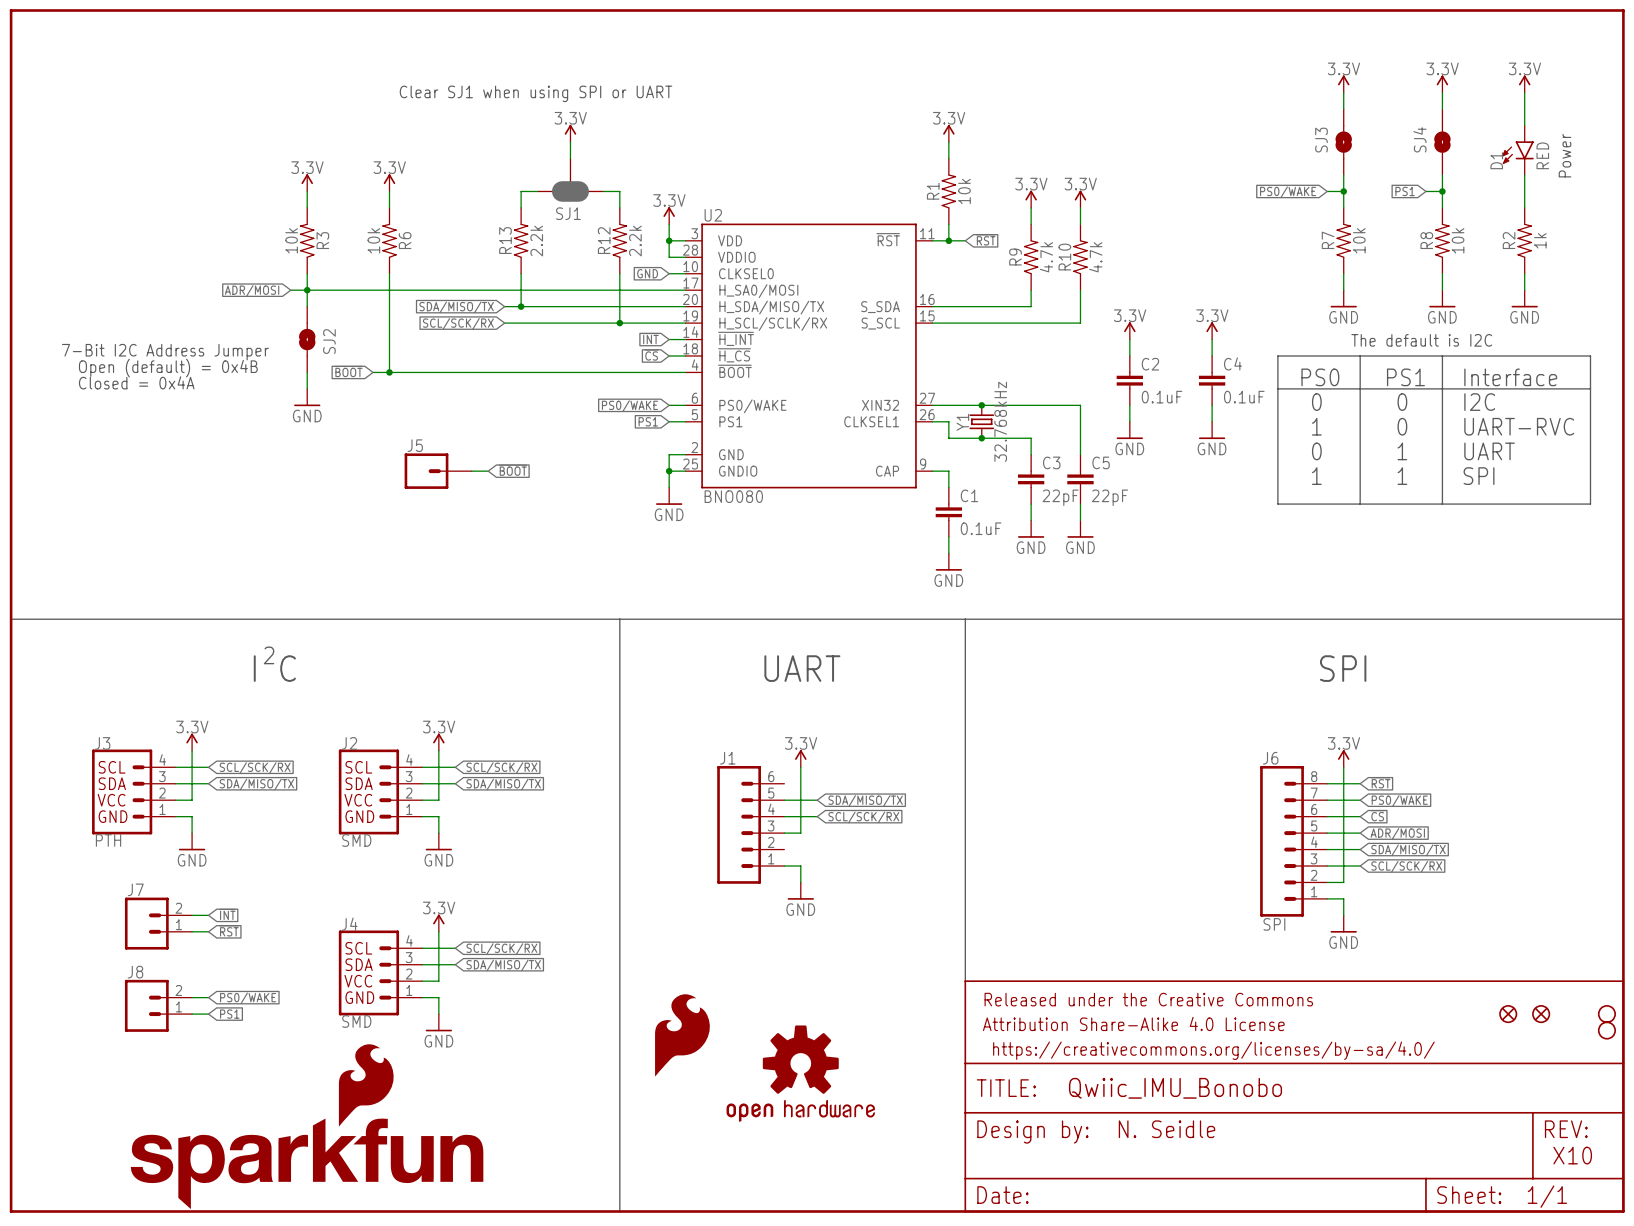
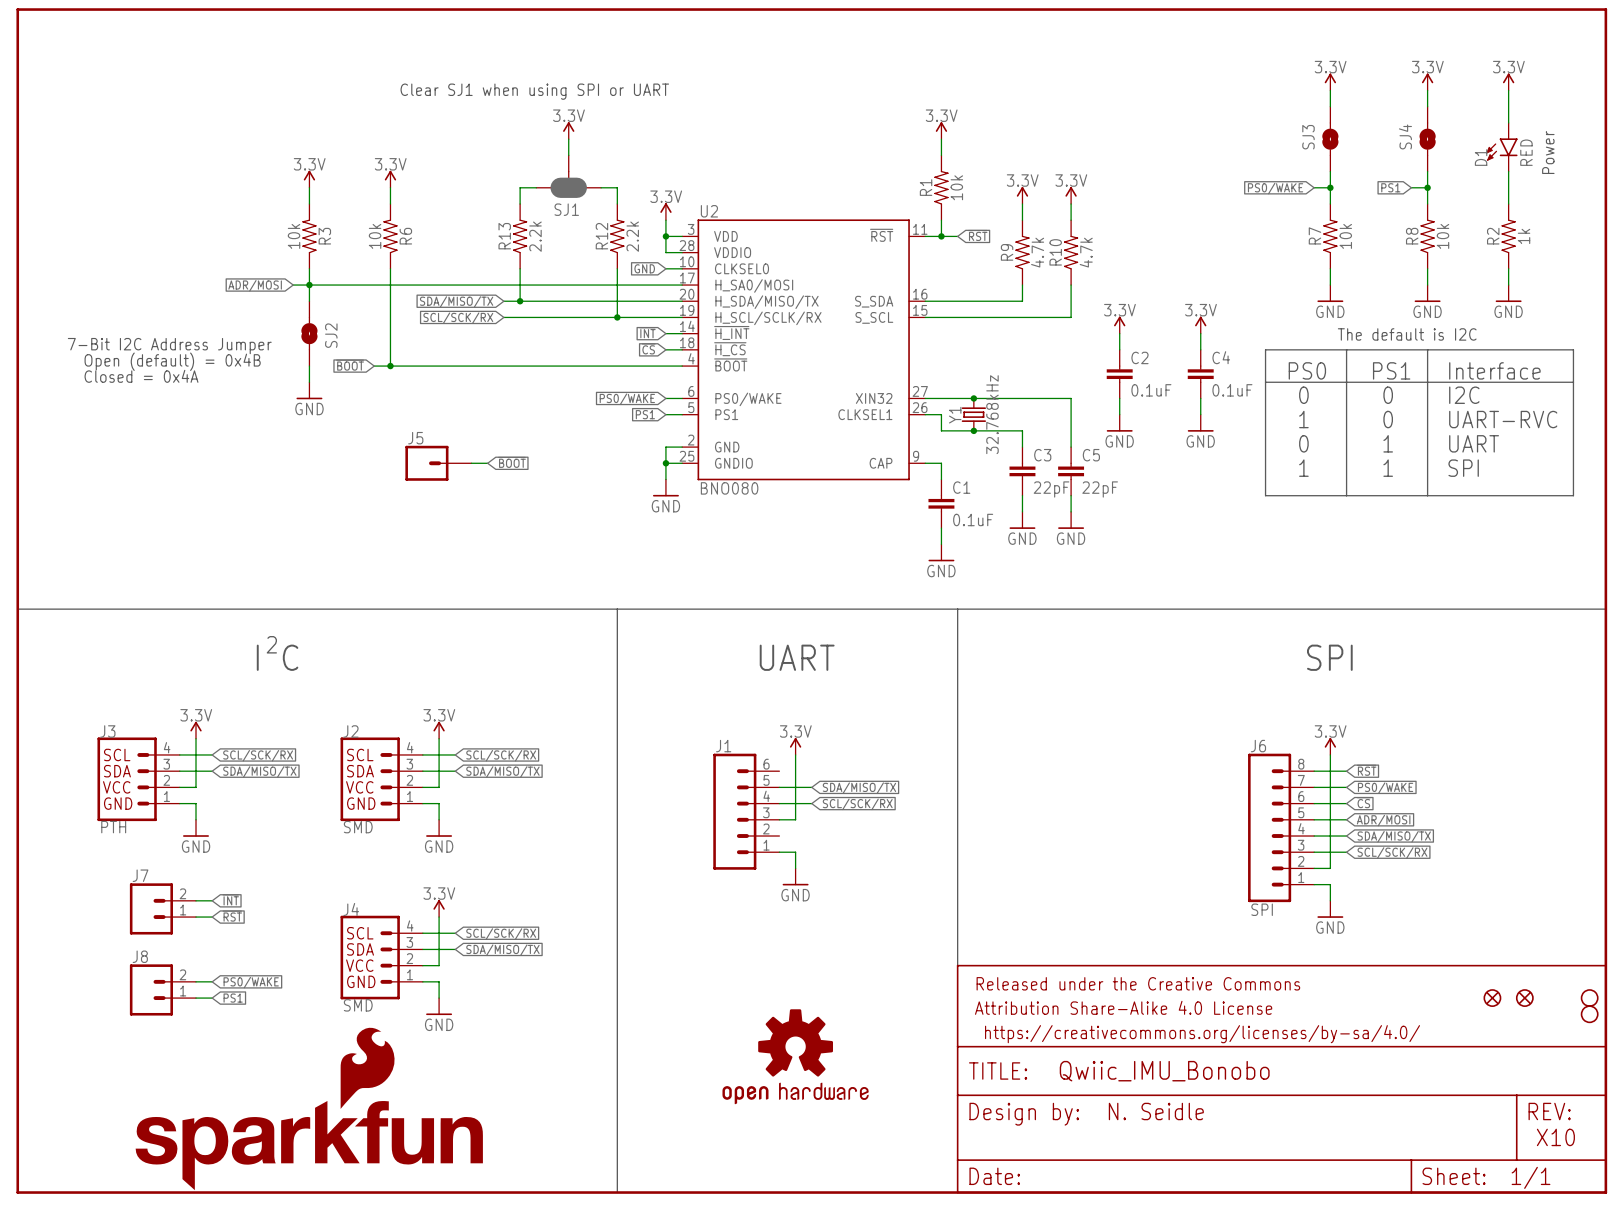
part: (682, 1035) -> none

